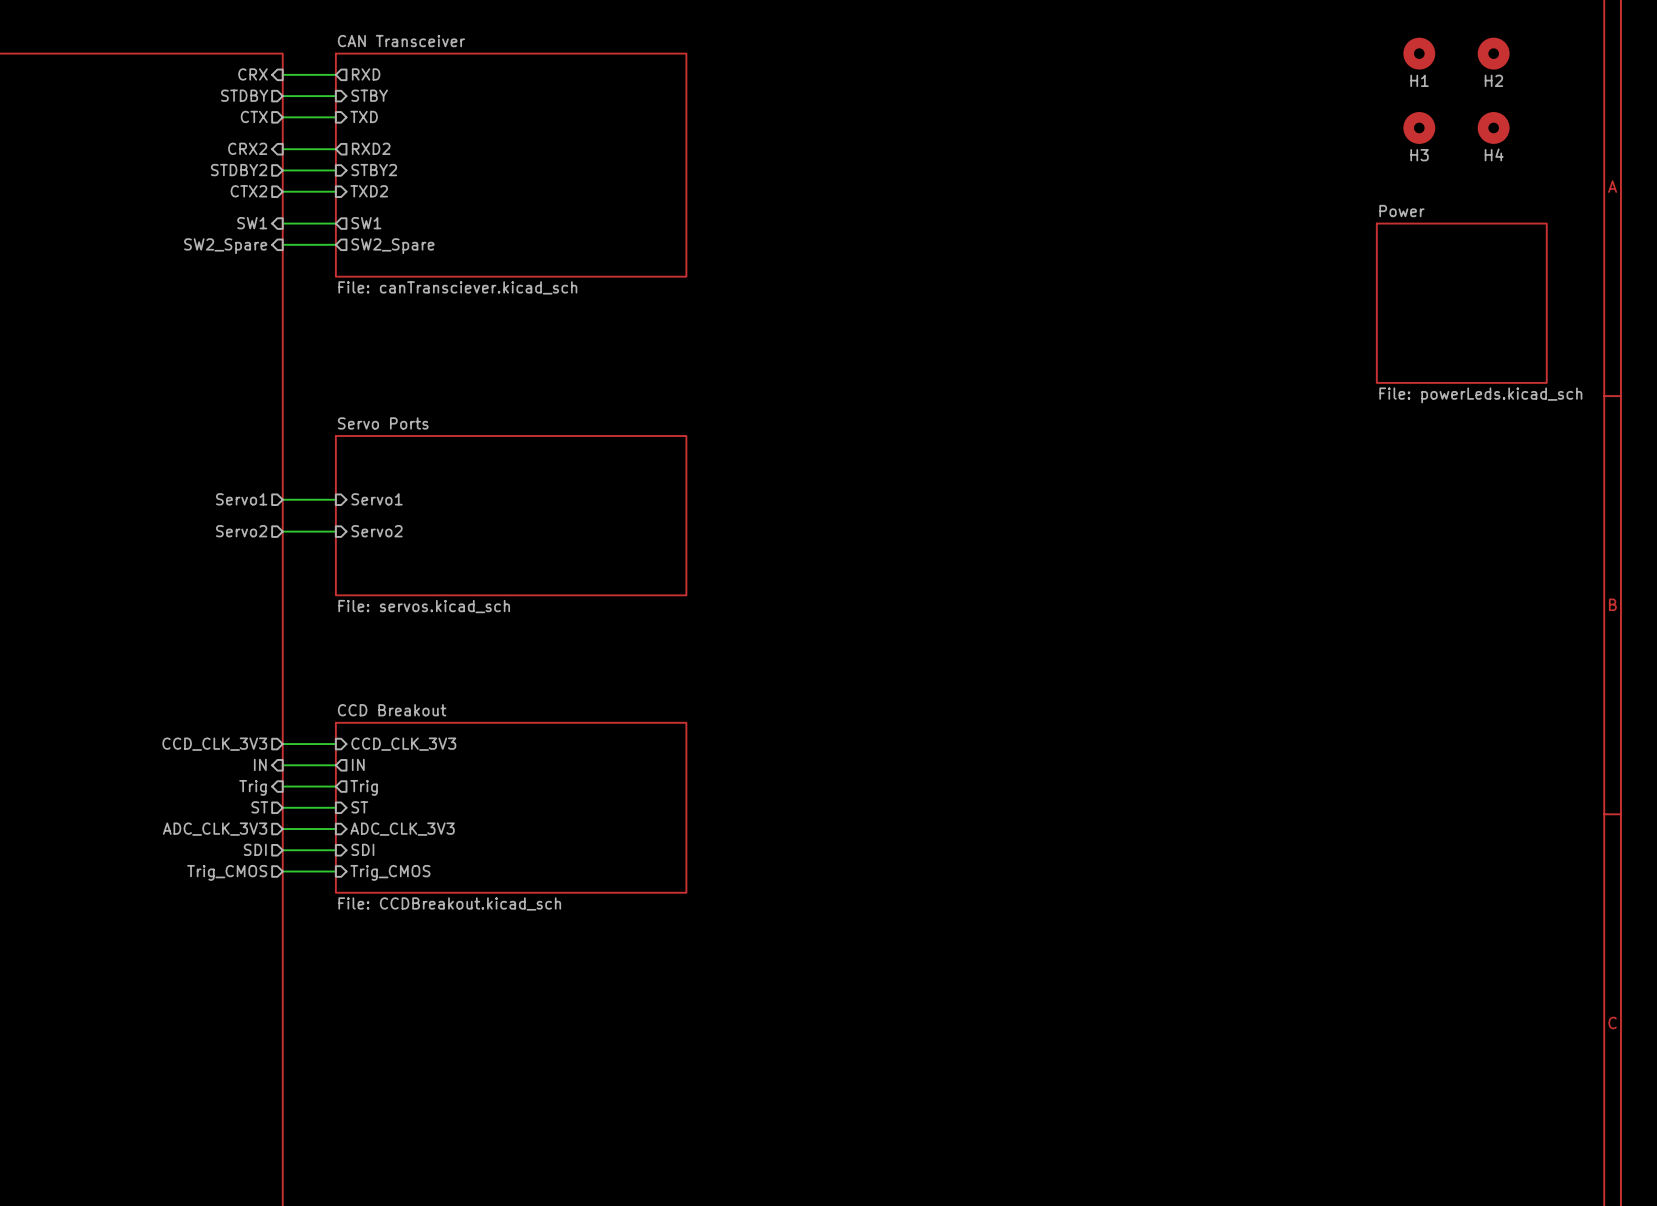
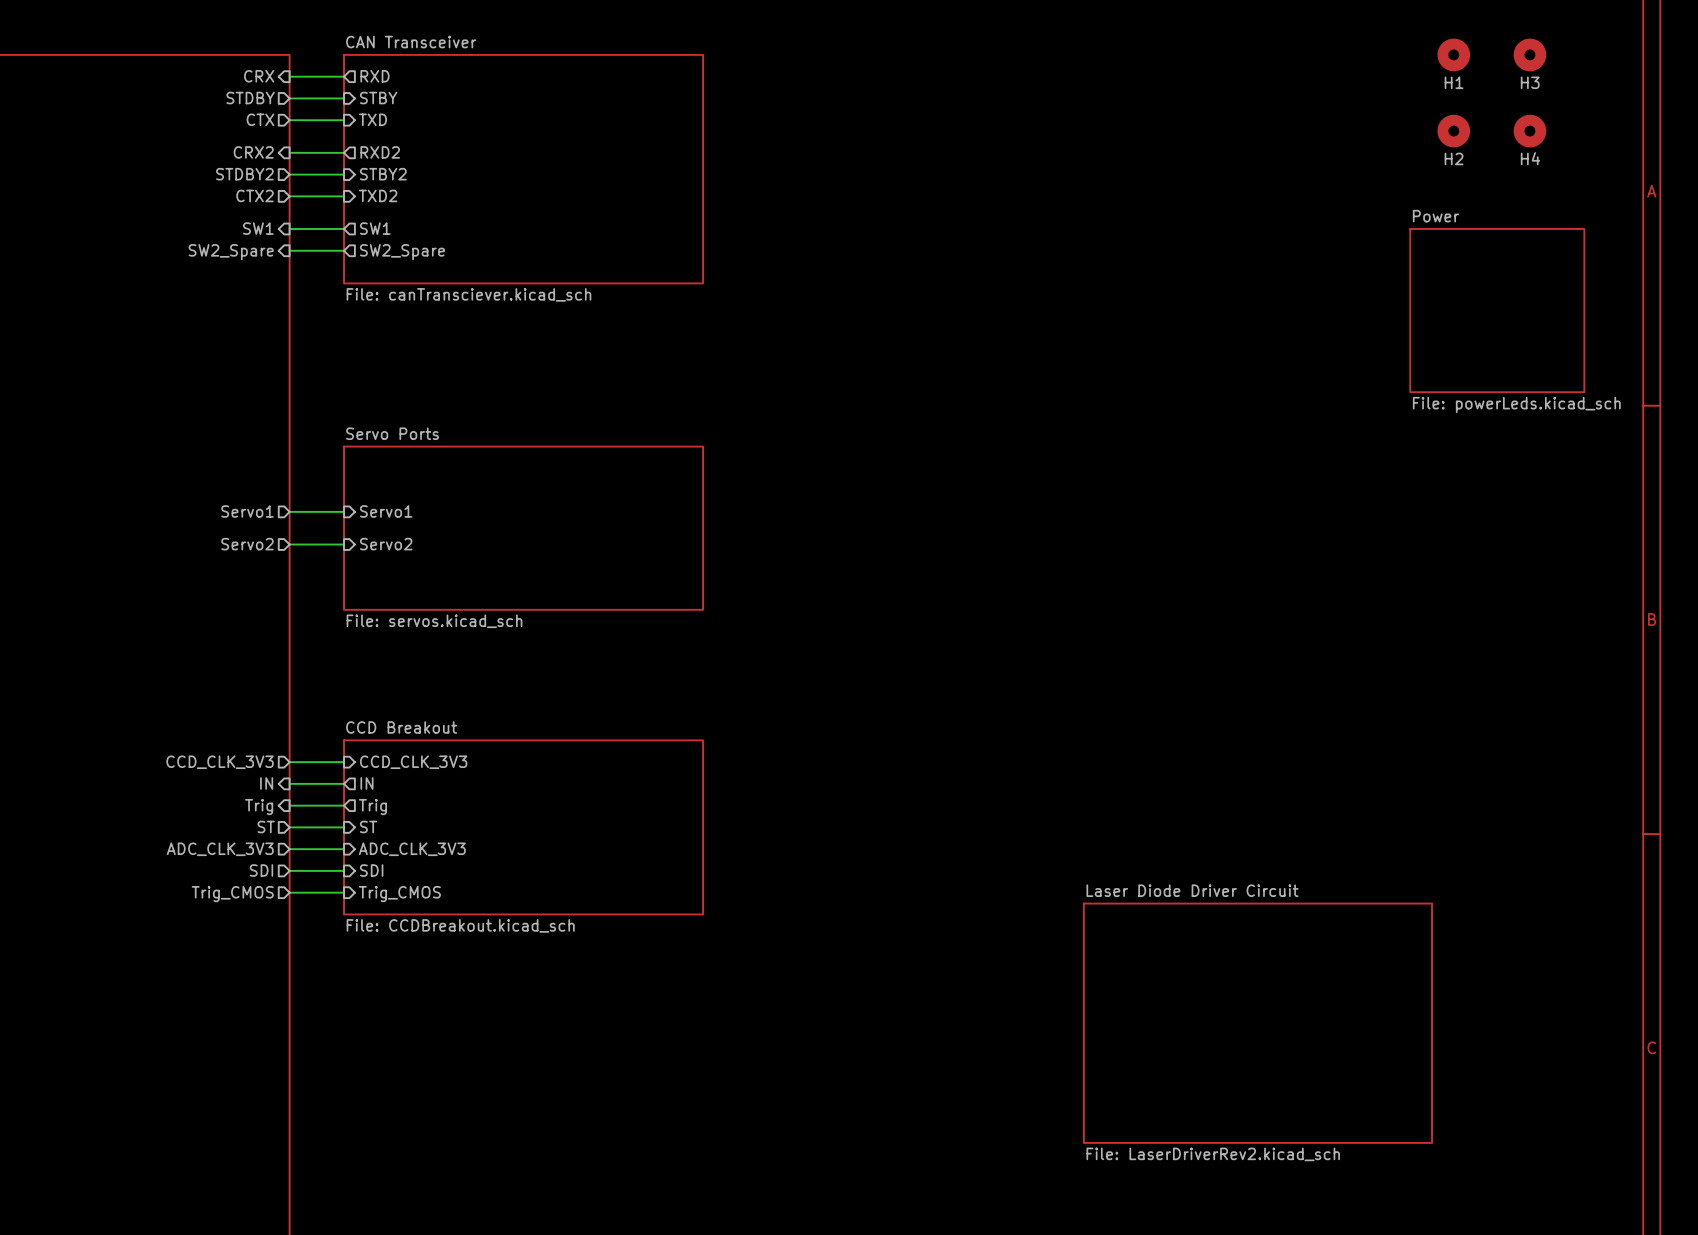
H2 name: H2 (1493, 80) -> H3 (1530, 82)
H3 name: H3 (1419, 155) -> H2 (1454, 158)
sheet Laser Diode Driver Circuit: none -> File: LaserDriverRev2.kicad_sch (1257, 1023)

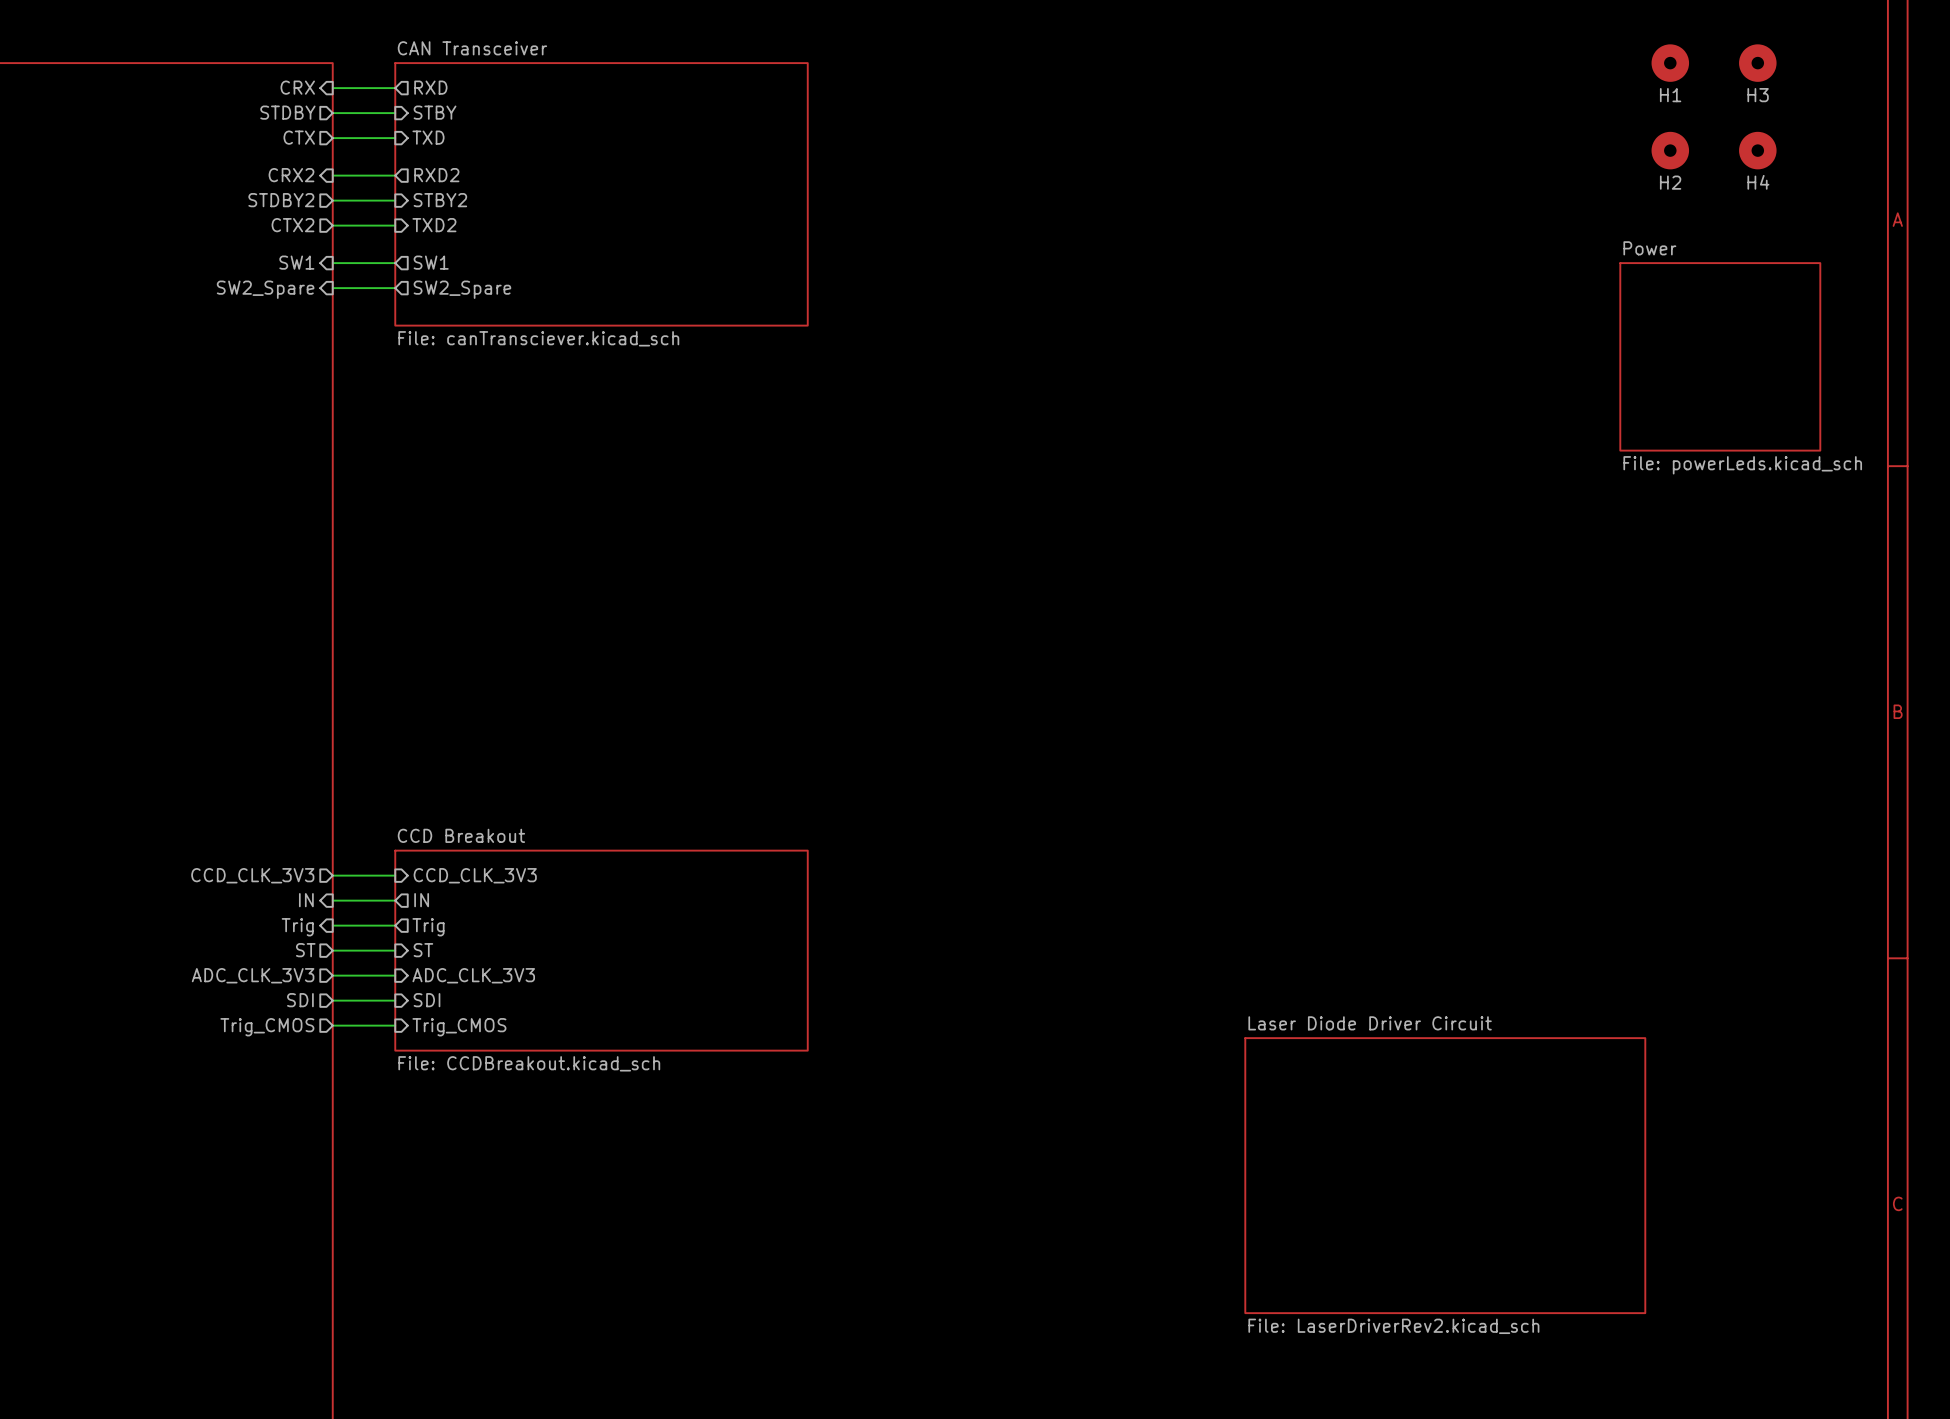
sheet pin: Servo1 (247, 511) -> none
wire: (289, 511) (344, 511) -> none
sheet pin: Servo1 (386, 511) -> none
sheet Servo Ports: File: servos.kicad_sch (523, 528) -> none
sheet pin: Servo2 (247, 544) -> none
wire: (289, 544) (344, 544) -> none
sheet pin: Servo2 (386, 544) -> none

